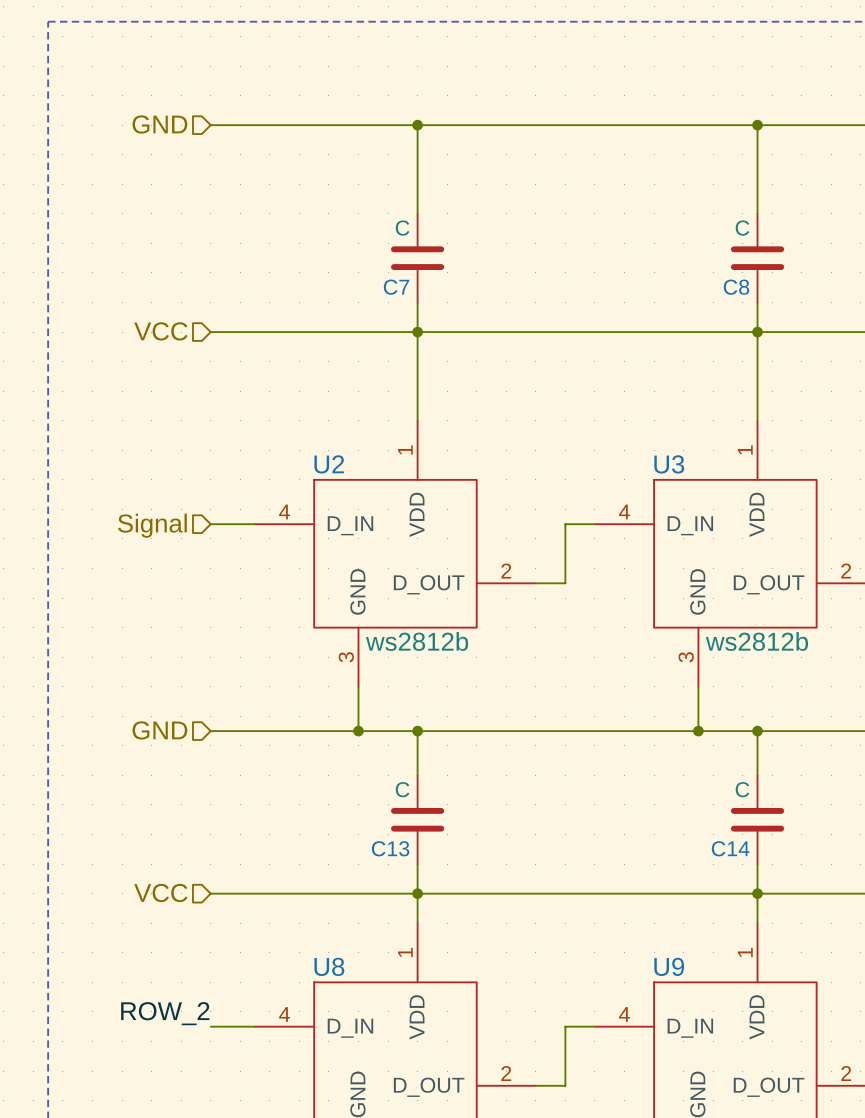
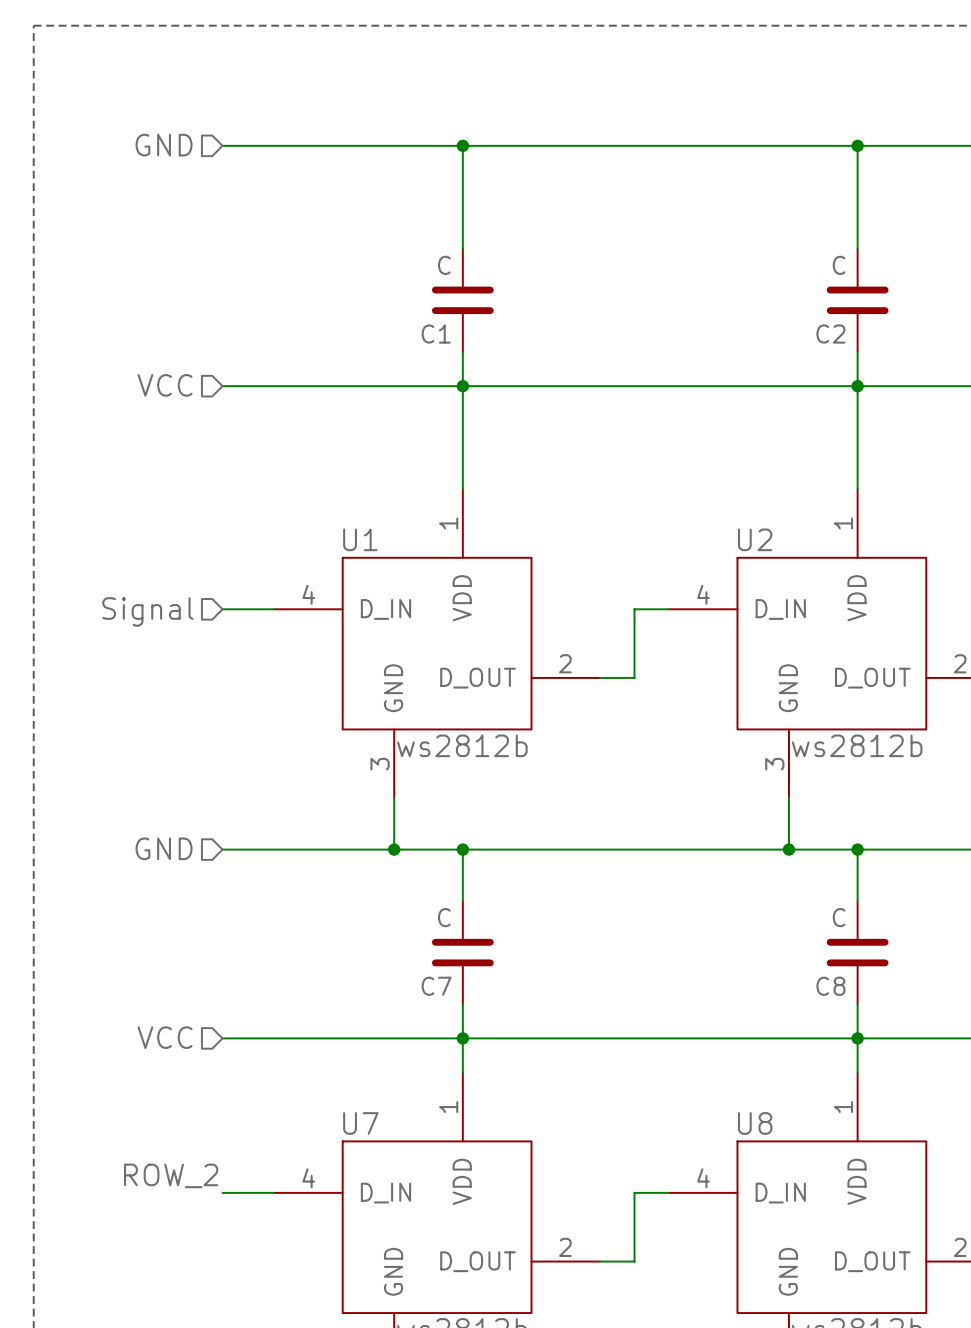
C7 name: C7 (396, 287) -> C1 (436, 334)
C8 name: C8 (736, 287) -> C2 (830, 334)
U2 name: U2 (329, 464) -> U1 (360, 539)
U3 name: U3 (669, 464) -> U2 (755, 539)
C13 name: C13 (390, 848) -> C7 (436, 986)
C14 name: C14 (730, 848) -> C8 (830, 986)
U8 name: U8 (329, 966) -> U7 (360, 1123)
U9 name: U9 (669, 966) -> U8 (755, 1123)

